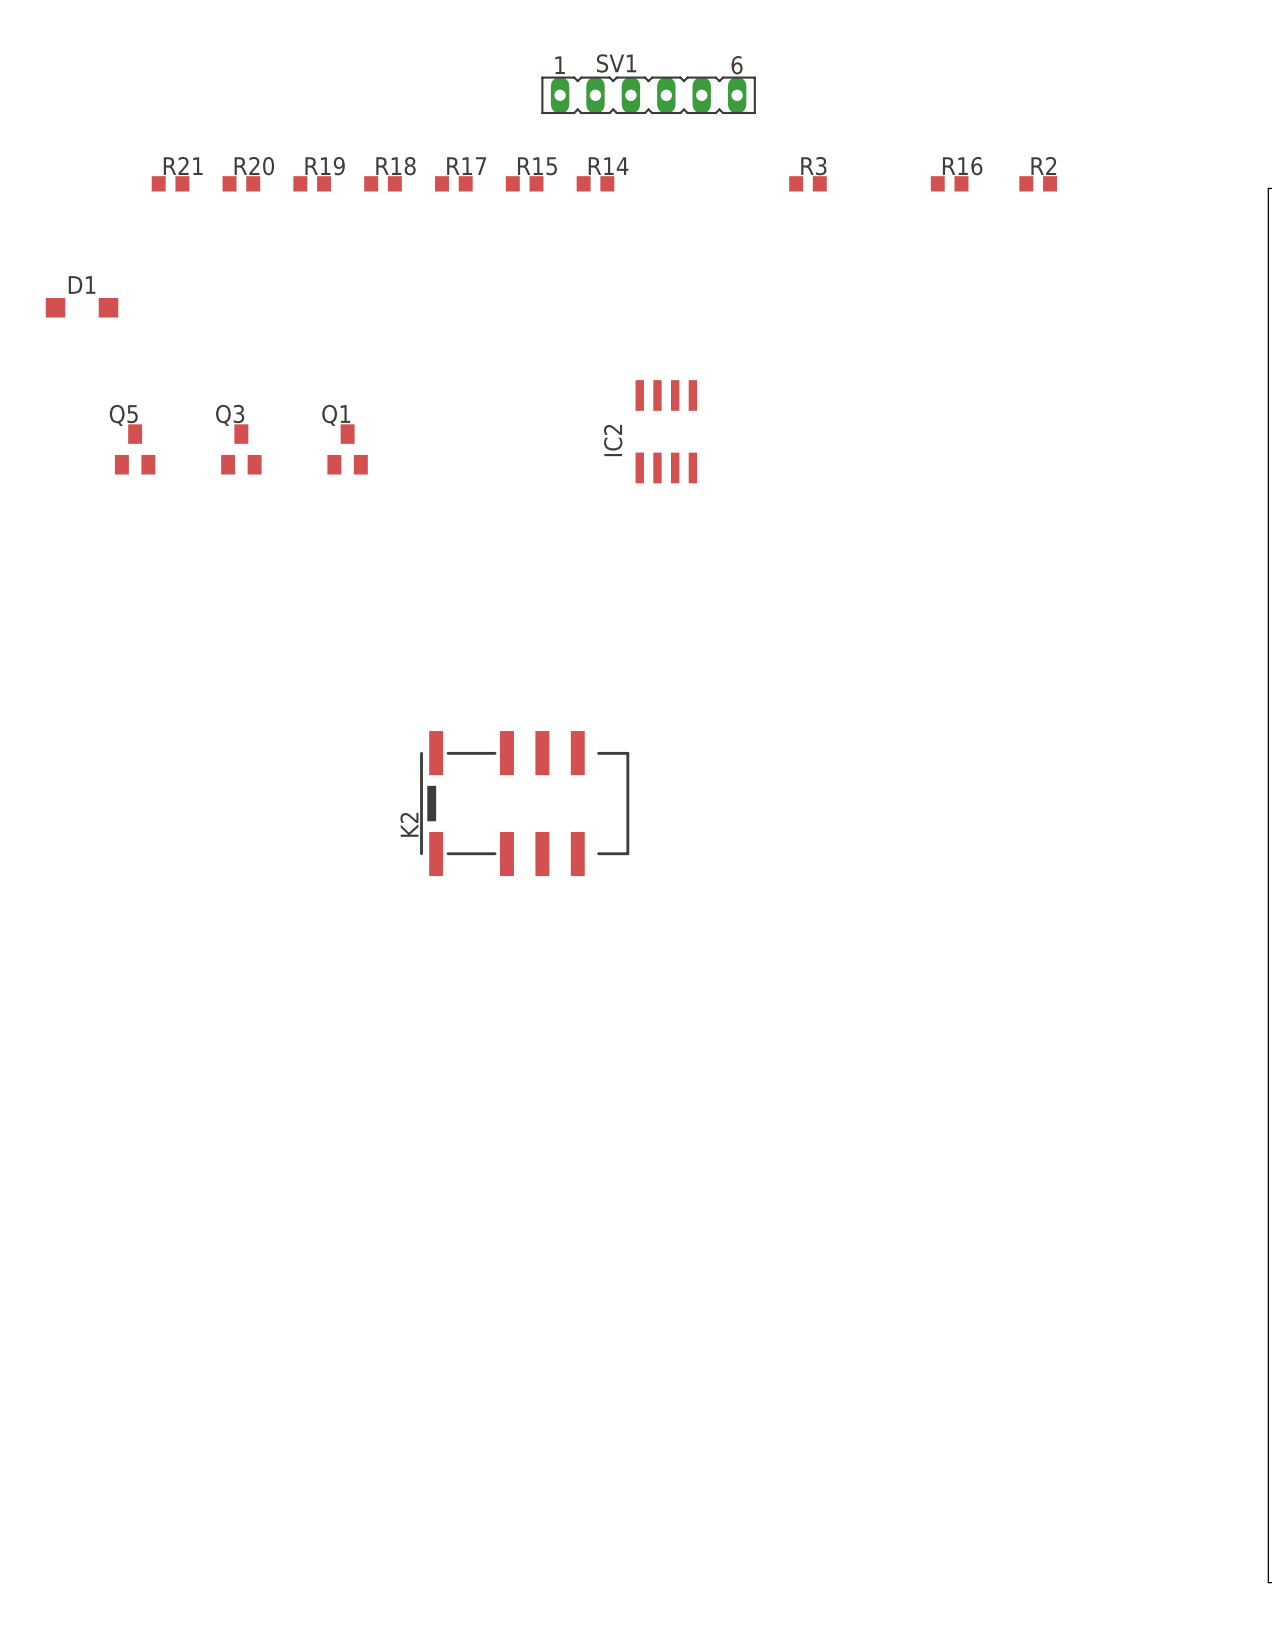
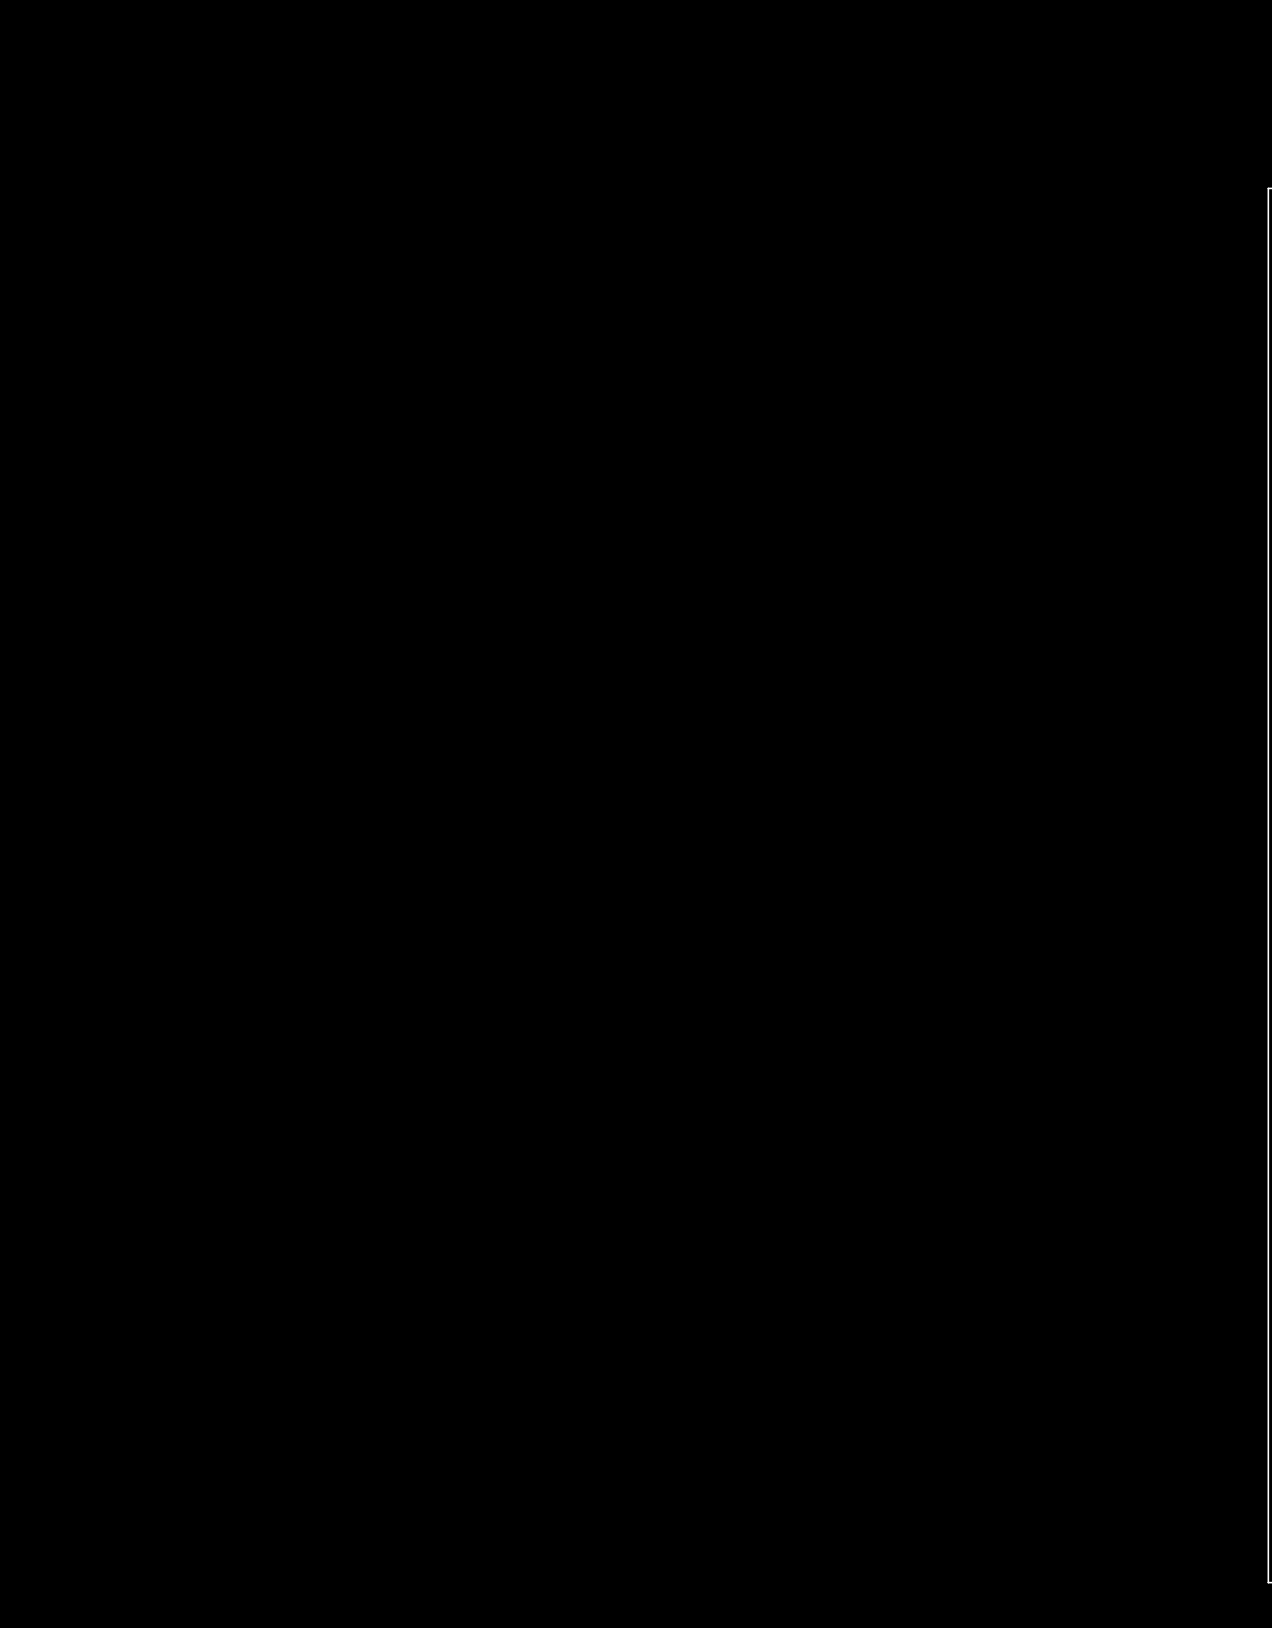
SV1: (648, 95) -> none
R21: (170, 183) -> none
R20: (241, 183) -> none
R19: (312, 183) -> none
R18: (383, 183) -> none
R17: (453, 183) -> none
R15: (524, 183) -> none
R14: (595, 183) -> none
R3: (807, 183) -> none
R16: (949, 183) -> none
R2: (1038, 183) -> none
D1: (82, 307) -> none
IC2: (666, 431) -> none
Q5: (135, 449) -> none
Q3: (241, 449) -> none
Q1: (347, 449) -> none
K2: (524, 803) -> none

